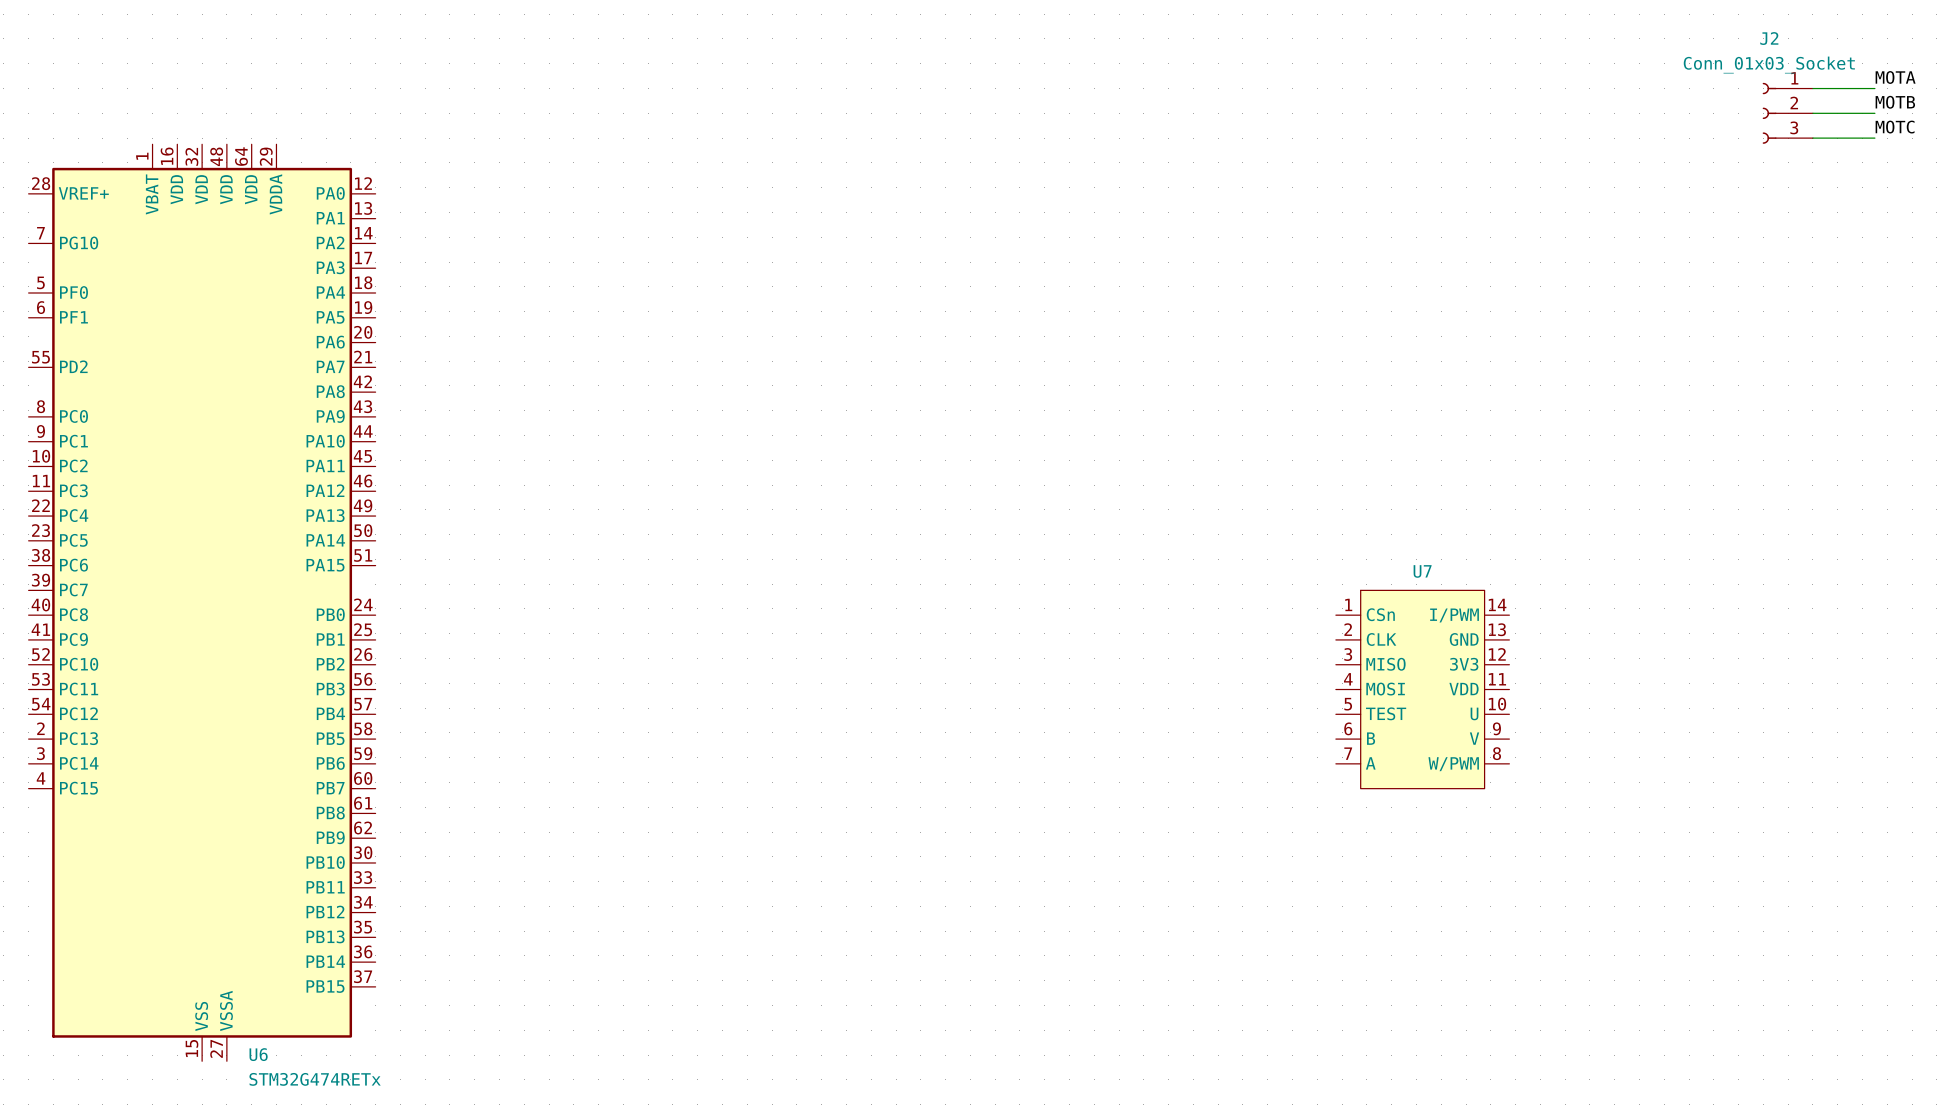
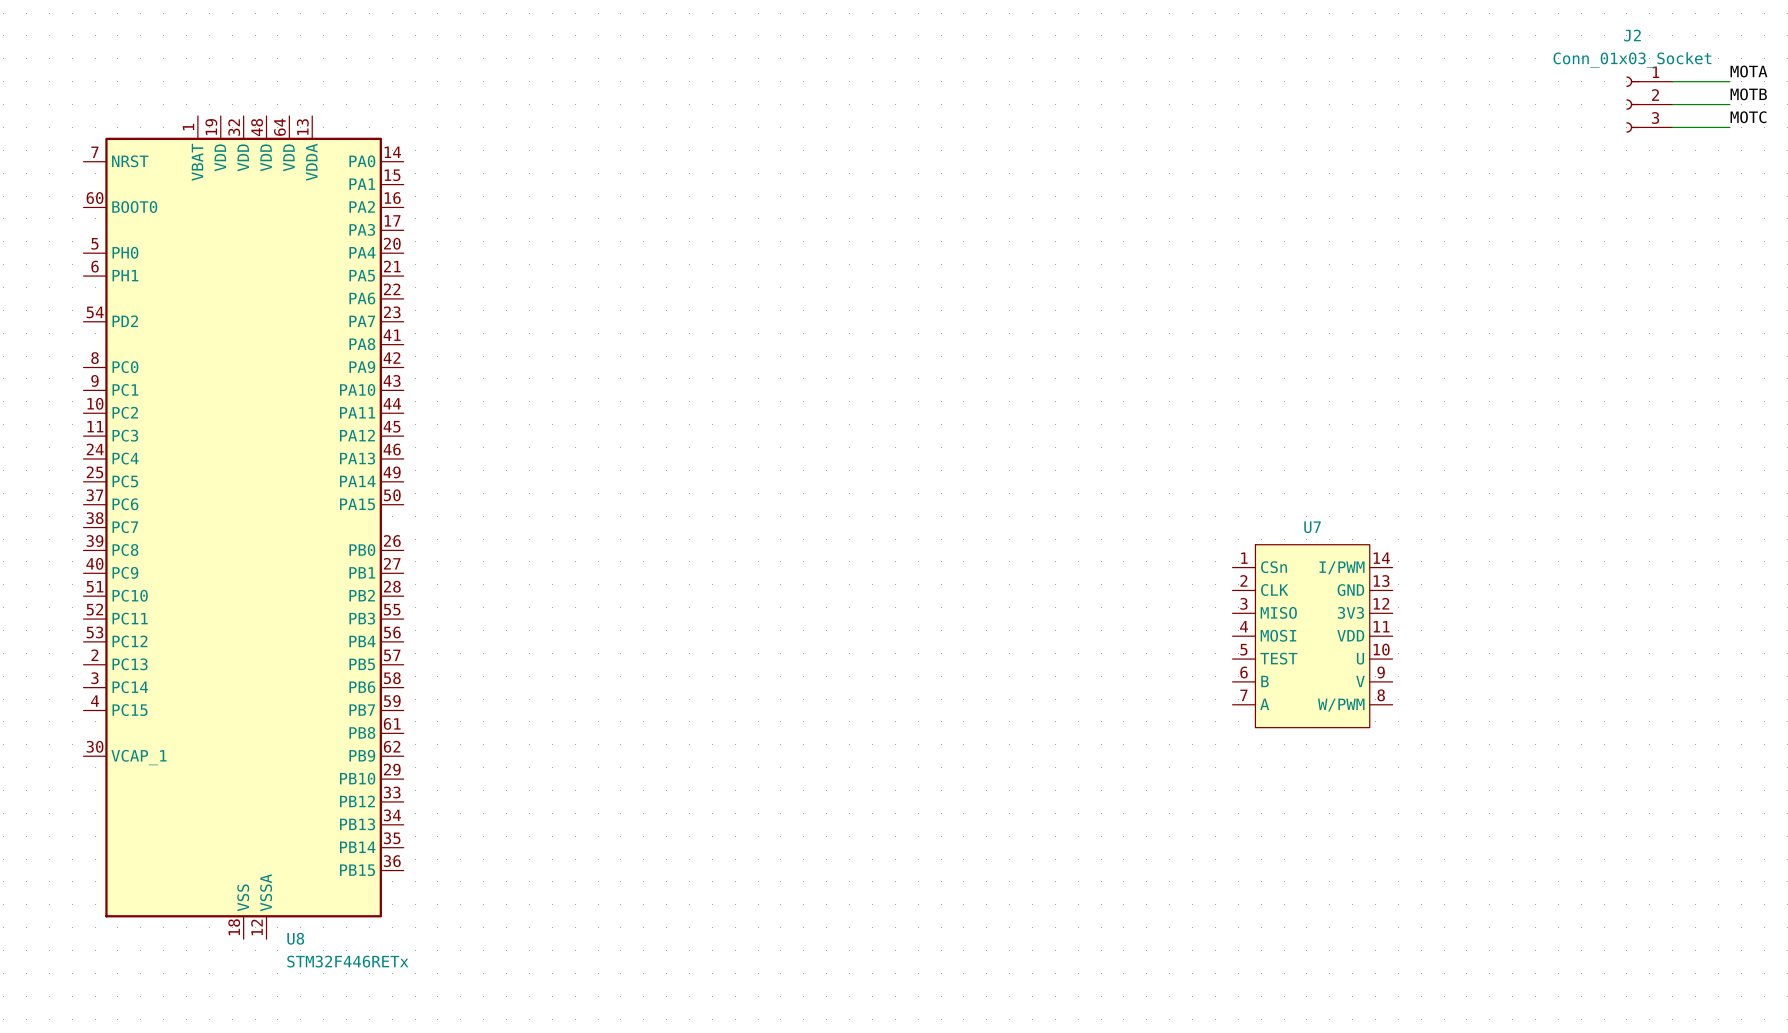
U8: none -> STM32F446RETx (243, 527)
U6: STM32G474RETx (202, 602) -> none

